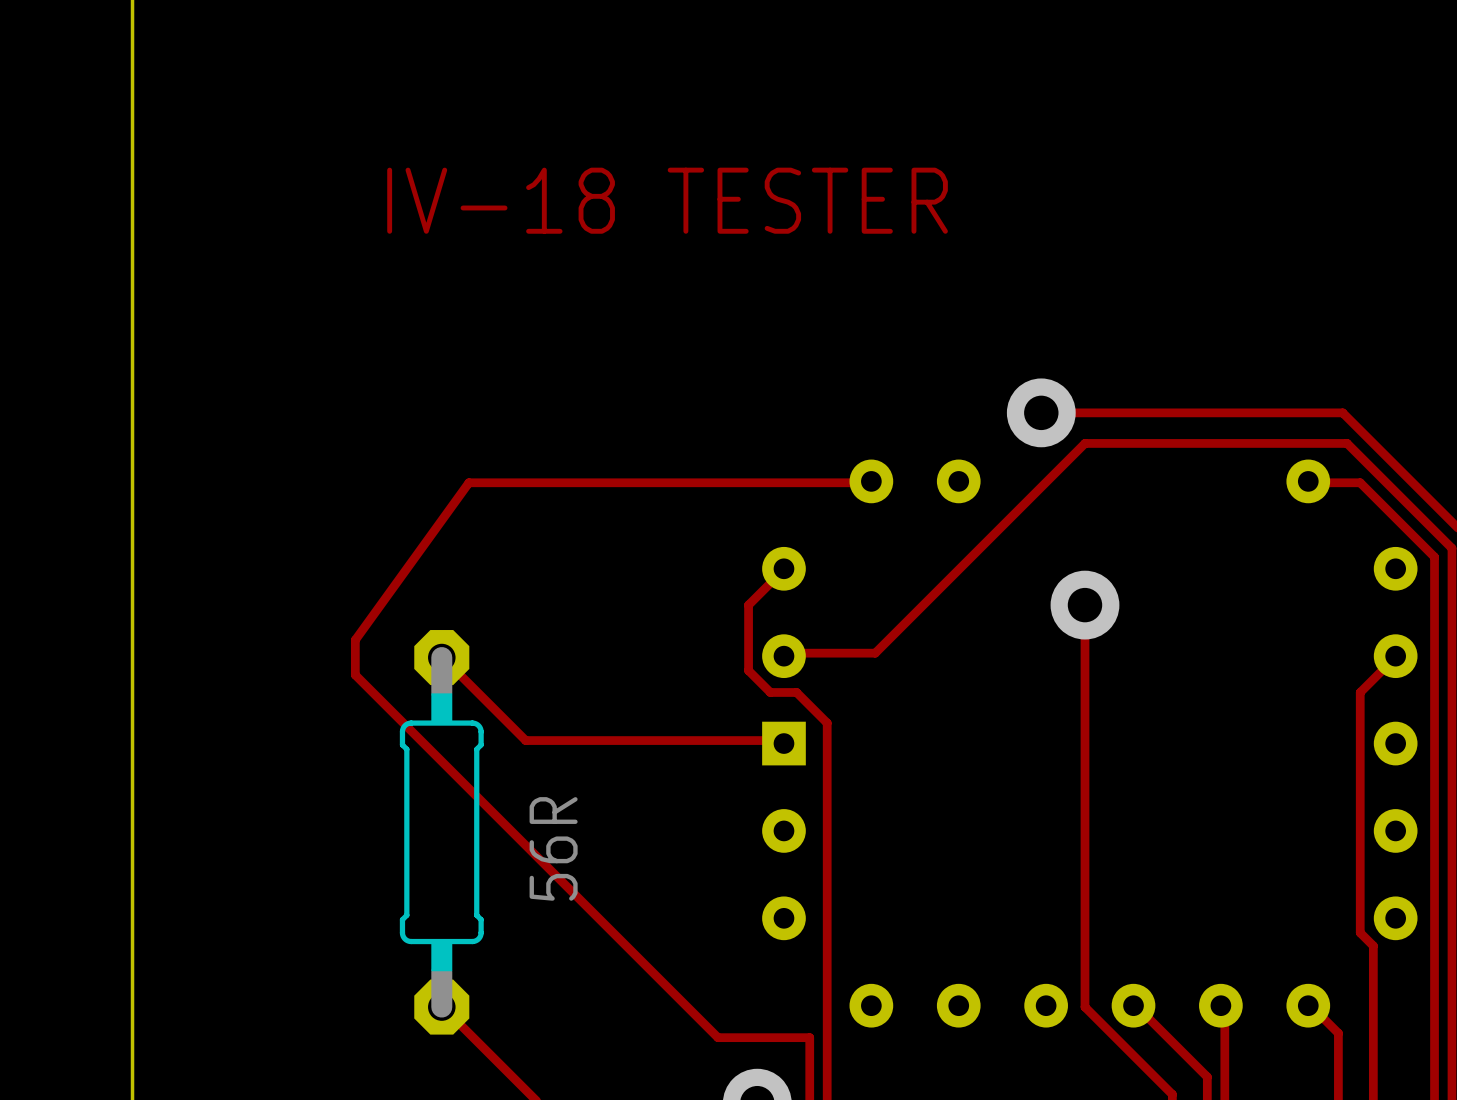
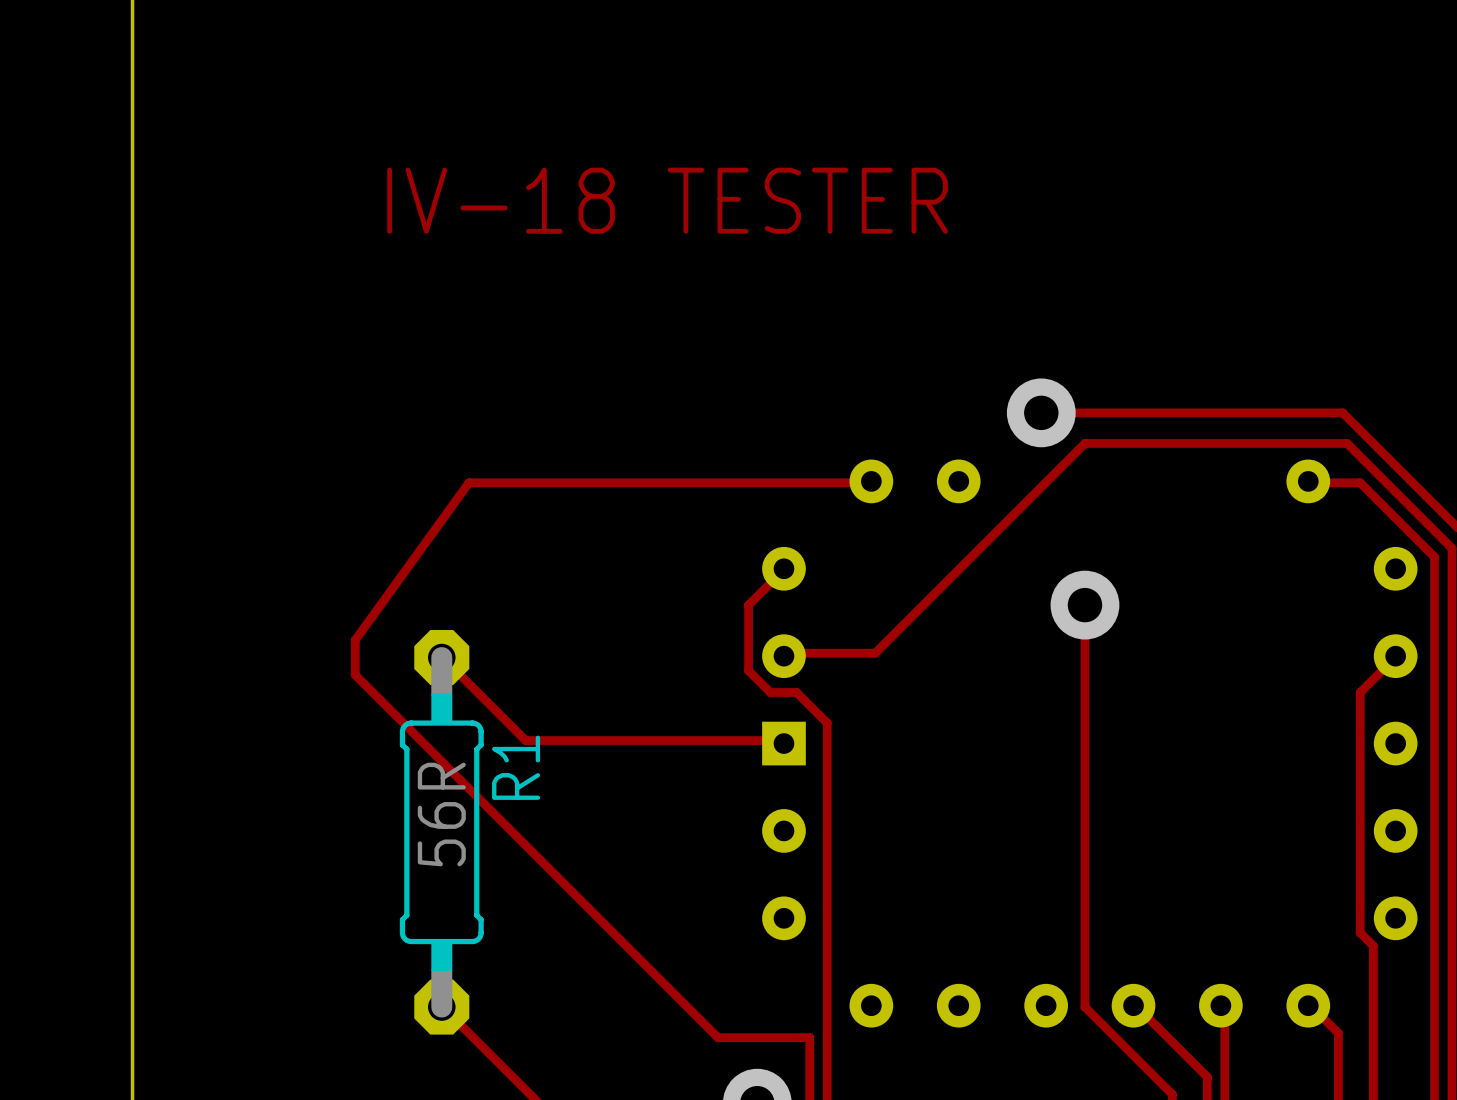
R1 name: none -> R1 (516, 767)
R1 value position: 56R (553, 848) -> 56R (441, 814)

